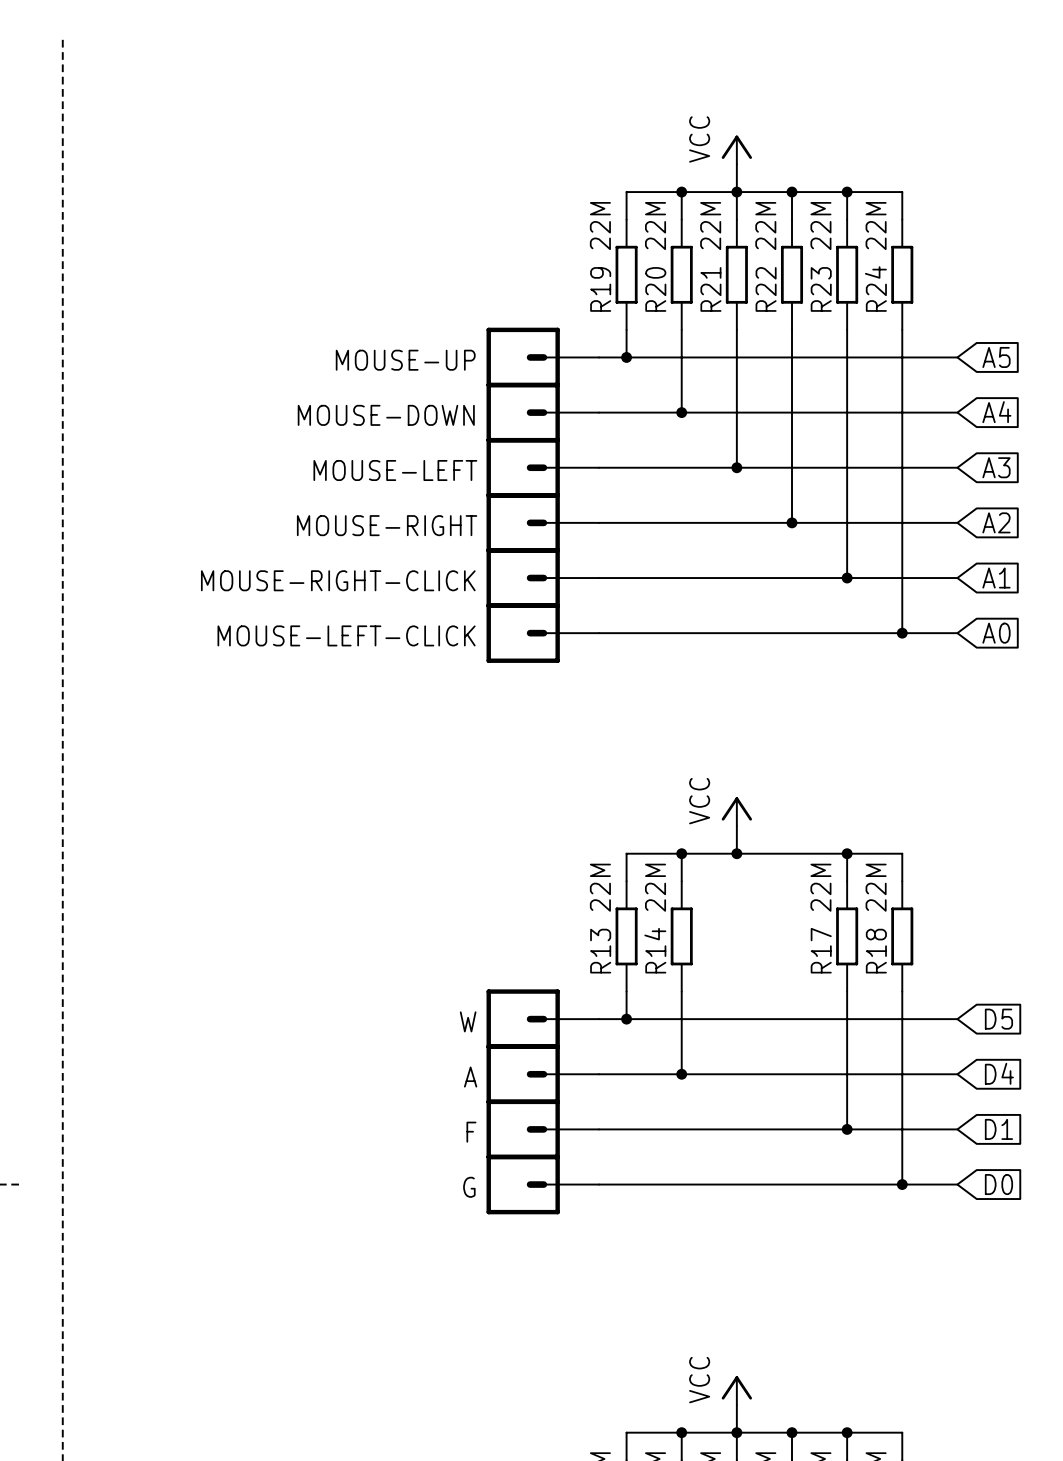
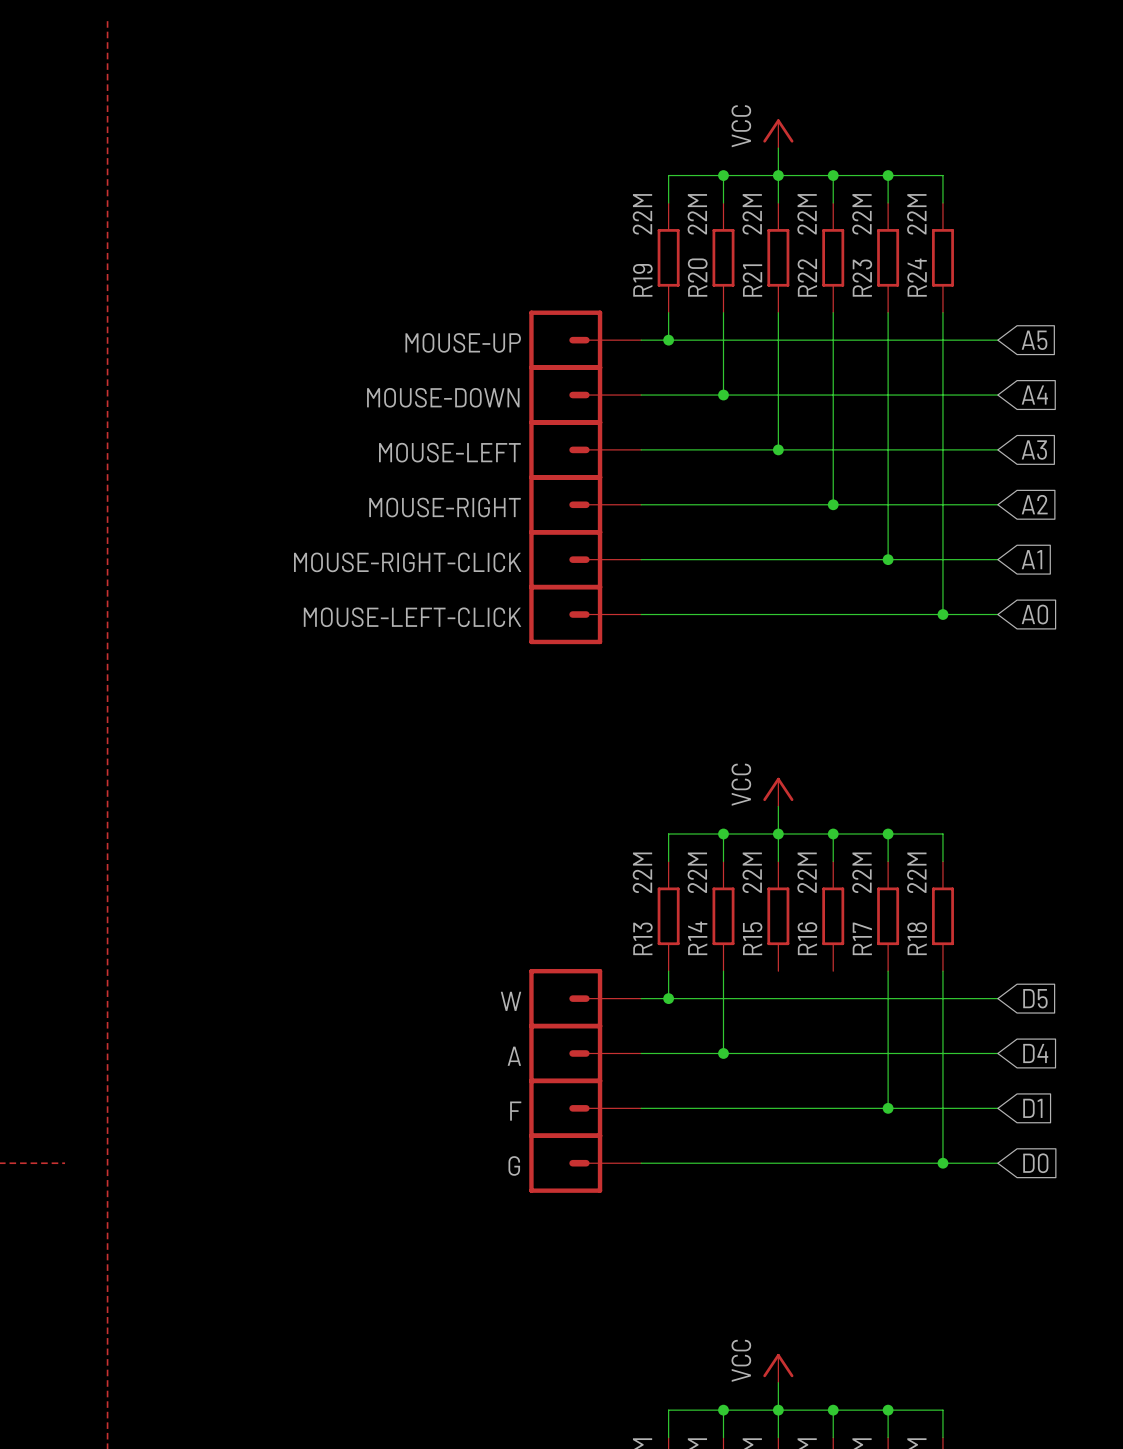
wire: none -> (778, 834) (778, 861)
wire: none -> (833, 834) (833, 861)
junction: none -> (833, 834)
R15: none -> 22M (778, 916)
R16: none -> 22M (833, 916)

